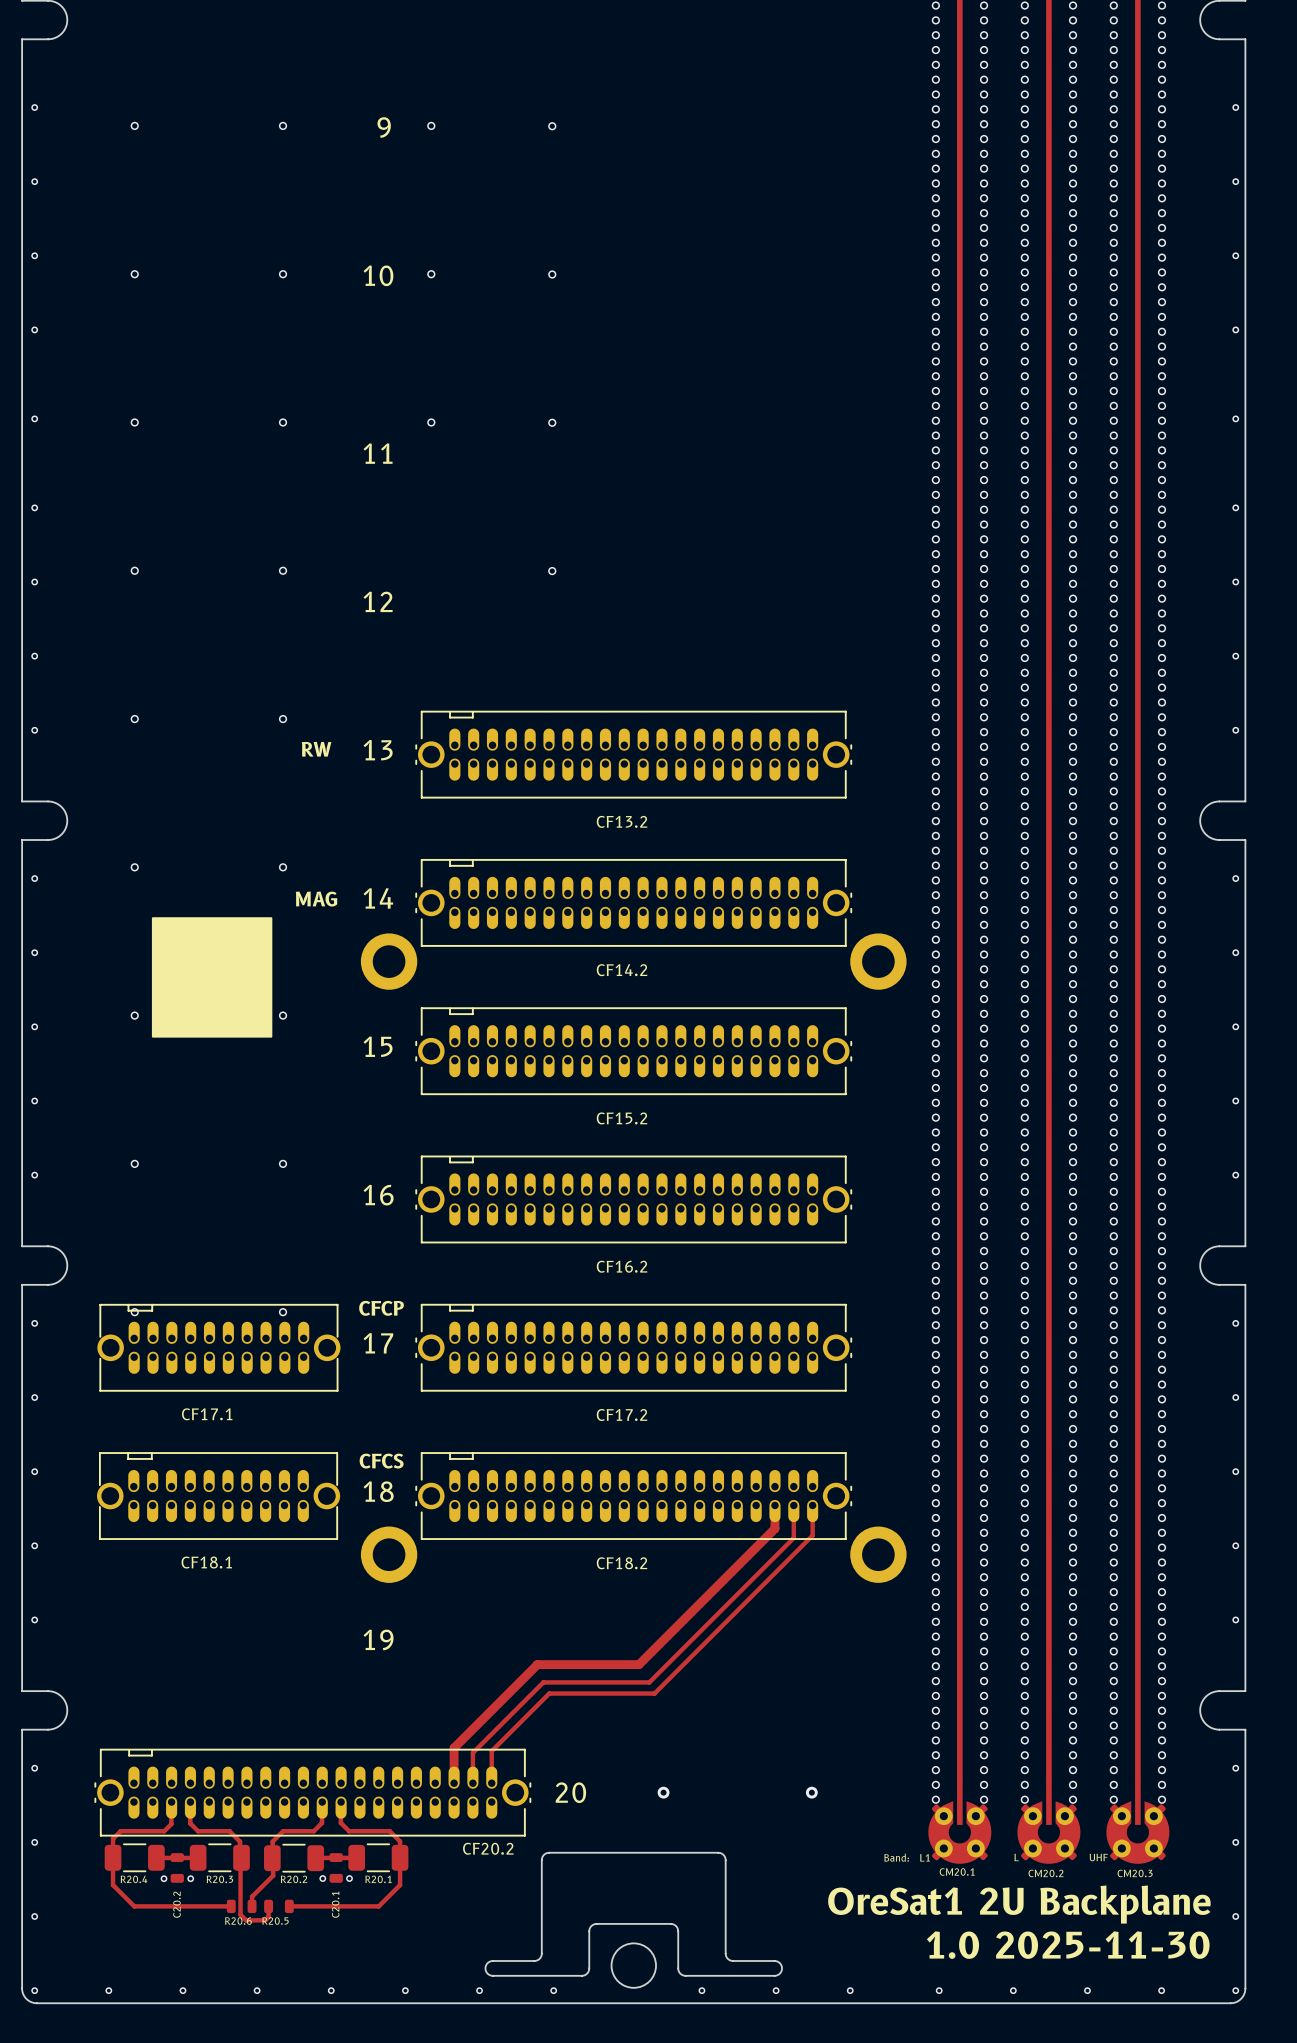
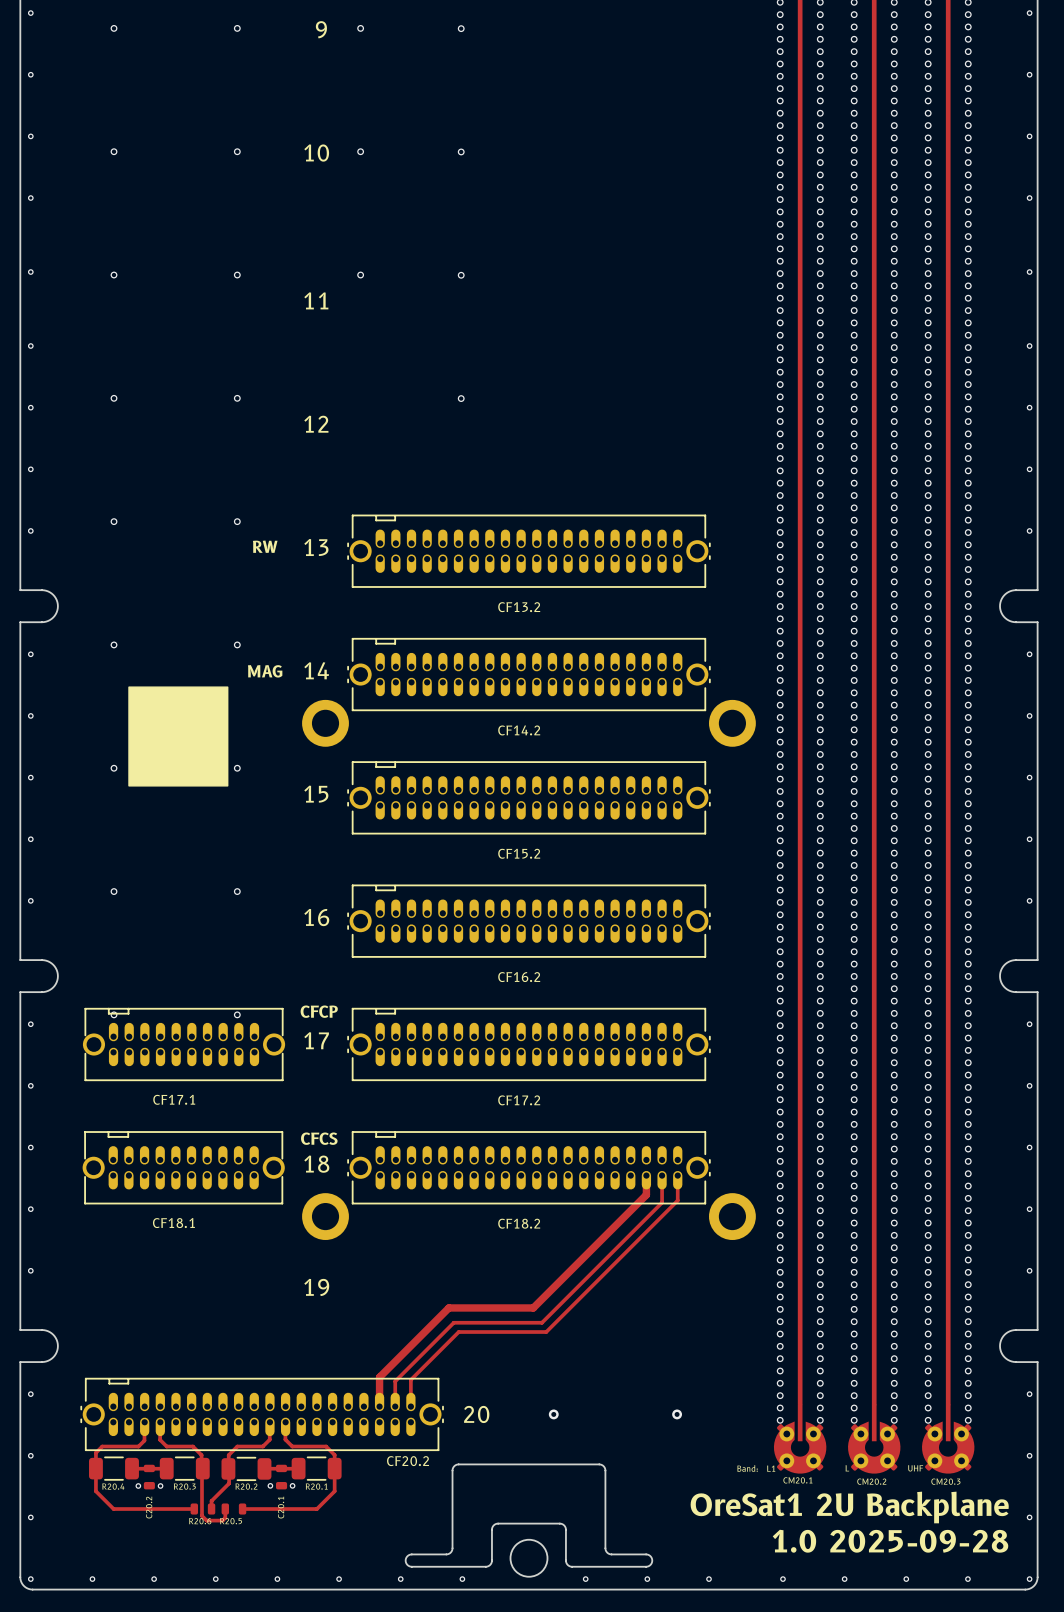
text: 1.0 2025-11-30 (1068, 1945) -> 1.0 2025-09-28 (890, 1541)

